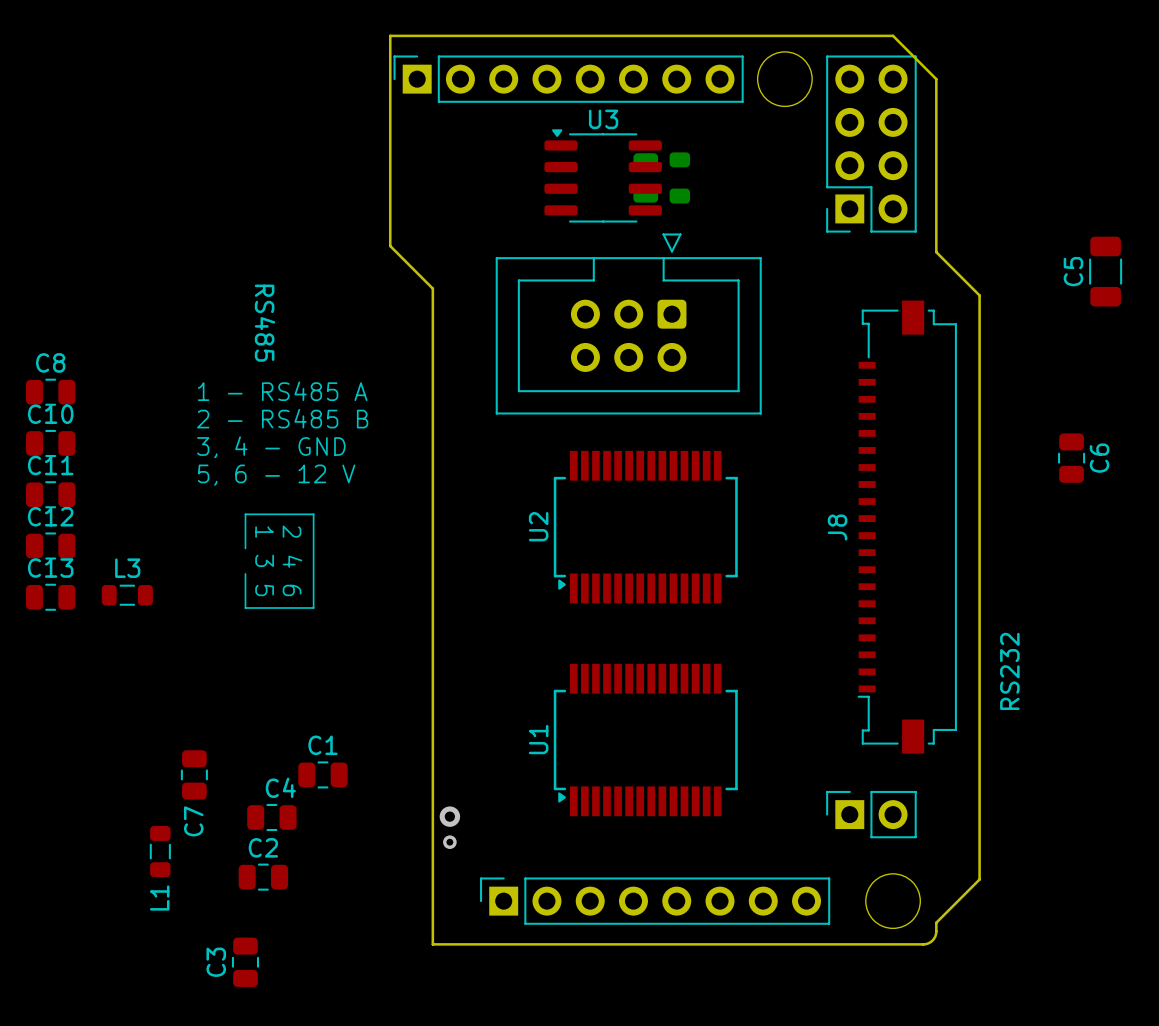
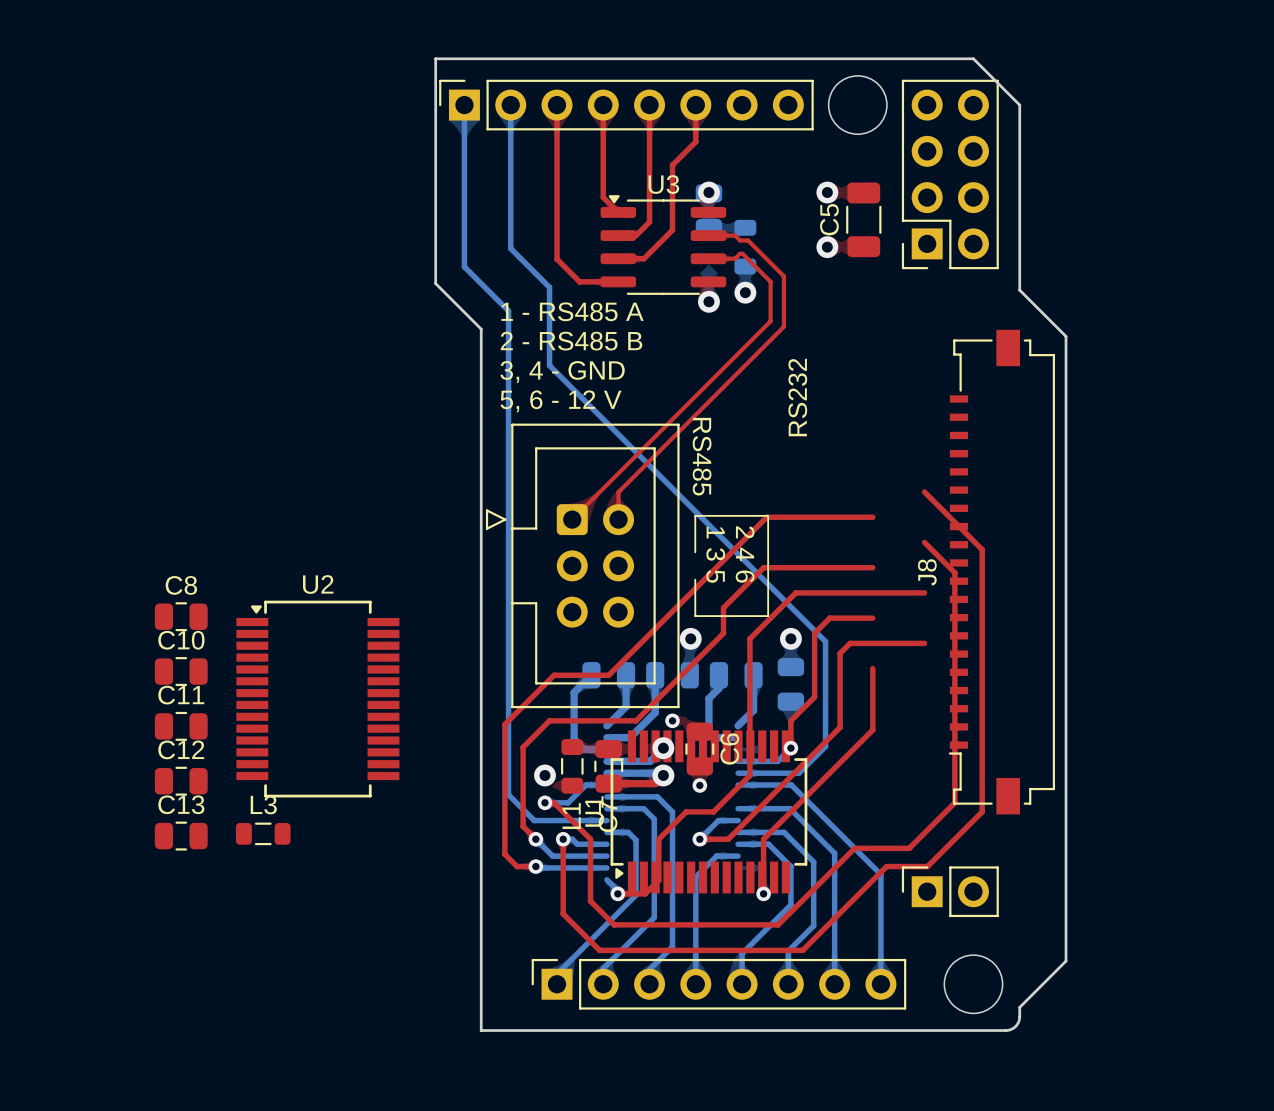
bottom track: none -> (464, 105) (464, 266) (508, 310) (508, 794) (534, 820) (606, 820)
bottom track: none -> (510, 105) (510, 248) (549, 287) (549, 365) (825, 641) (825, 746) (798, 773) (738, 773)
top track: none -> (557, 105) (557, 259) (579, 281) (618, 281)
top track: none -> (603, 105) (603, 197) (618, 212)
top track: none -> (649, 105) (649, 222) (636, 235) (618, 235)
top track: none -> (695, 105) (695, 141) (672, 165) (672, 230) (643, 258) (618, 258)
via: none -> (708, 192)
via: none -> (827, 192)
U3 position: (603, 175) -> (663, 245)
part position: (679, 177) -> (745, 247)
top track: none -> (708, 235) (735, 235) (740, 240) (748, 240) (783, 276) (783, 326) (618, 492) (618, 519)
via: none -> (827, 247)
top track: none -> (708, 258) (735, 258) (742, 253) (770, 281) (770, 321) (572, 519)
via: none -> (745, 292)
via: none -> (708, 301)
C5 position: (1105, 271) -> (863, 219)
text position: RS485 (265, 323) -> RS485 (702, 456)
part rotation: 0° (628, 323) -> 90° counterclockwise (582, 565)
part position: (628, 323) -> (582, 565)
text: none -> RS232 (797, 397)
text position: 1 - RS485 A (282, 391) -> 1 - RS485 A (572, 311)
C8 position: (50, 392) -> (181, 616)
text position: 2 - RS485 B (282, 418) -> 2 - RS485 B (571, 341)
top track: none -> (924, 492) (982, 549) (982, 811) (927, 866) (886, 866) (802, 950) (599, 950) (563, 913) (563, 839)
C10 position: (50, 443) -> (181, 671)
text position: 3, 4 - GND (271, 447) -> 3, 4 - GND (562, 372)
C6 position: (1071, 458) -> (699, 749)
top track: none -> (872, 517) (766, 517) (608, 675) (554, 675) (504, 724) (504, 854) (517, 866) (535, 866)
text position: 5, 6 - 12 V (276, 475) -> 5, 6 - 12 V (561, 401)
top track: none -> (924, 542) (954, 572) (954, 802) (909, 848) (854, 848) (778, 924) (614, 924) (590, 901) (590, 839) (554, 802) (544, 802)
C11 position: (50, 494) -> (181, 726)
top track: none -> (872, 567) (763, 567) (723, 607) (723, 633) (636, 720) (549, 720) (523, 747) (523, 826) (535, 839)
U2 rotation: 0° (645, 527) -> 90° clockwise (317, 699)
U2 position: (645, 527) -> (317, 699)
J8 position: (907, 527) -> (1001, 572)
top track: none -> (924, 592) (795, 592) (749, 638) (749, 775) (713, 811) (686, 811) (658, 839) (658, 880) (645, 893) (617, 893)
C12 position: (50, 546) -> (181, 781)
line: (245, 548) (245, 514) (313, 514) (313, 607) (245, 607) (245, 573) -> (695, 552) (695, 515) (768, 515) (768, 616) (695, 616) (695, 579)
top track: none -> (872, 618) (829, 618) (814, 633) (814, 697) (790, 720) (790, 748)
text position: 2 4 6 (292, 560) -> 2 4 6 (745, 554)
text position: 1 3 5 (264, 561) -> 1 3 5 (715, 554)
via: none -> (690, 638)
via: none -> (790, 638)
top track: none -> (924, 643) (850, 643) (840, 653) (840, 727) (728, 839) (699, 839)
L3 position: (127, 595) -> (263, 833)
C13 position: (50, 597) -> (181, 836)
top track: none -> (872, 668) (872, 730) (763, 839) (763, 893)
bottom track: none -> (591, 675) (574, 692) (574, 739) (584, 749) (606, 749)
bottom track: none -> (626, 675) (626, 706) (606, 725)
bottom track: none -> (655, 675) (655, 712) (630, 737) (606, 737)
bottom track: none -> (718, 675) (718, 688) (708, 698) (708, 731) (715, 737) (738, 737)
part: none -> (736, 675)
bottom track: none -> (753, 675) (753, 710) (738, 725)
part: none -> (790, 684)
via: none -> (672, 720)
text: RS232 (1009, 671) -> none
bottom track: none -> (663, 748) (650, 761) (606, 761)
via: none -> (663, 748)
bottom track: none -> (790, 748) (777, 761) (738, 761)
via: none -> (790, 748)
bottom track: none -> (606, 773) (661, 773) (663, 775)
via: none -> (544, 775)
top track: none -> (663, 775) (655, 783) (608, 783)
via: none -> (663, 775)
bottom track: none -> (606, 785) (585, 785) (568, 802) (544, 802)
bottom track: none -> (738, 785) (791, 785) (880, 874) (880, 984)
via: none -> (699, 785)
bottom track: none -> (606, 796) (657, 796) (672, 811) (672, 946) (649, 969) (649, 984)
via: none -> (544, 802)
bottom track: none -> (606, 808) (643, 808) (654, 819) (654, 917) (603, 968) (603, 984)
bottom track: none -> (738, 808) (790, 808) (834, 853) (834, 984)
bottom track: none -> (738, 820) (718, 820) (699, 839)
bottom track: none -> (606, 832) (628, 832) (636, 840) (636, 895) (557, 974) (557, 984)
bottom track: none -> (738, 832) (784, 832) (813, 862) (813, 925) (788, 951) (788, 984)
bottom track: none -> (535, 839) (552, 856) (606, 856)
via: none -> (535, 839)
bottom track: none -> (563, 839) (572, 839) (577, 844) (606, 844)
via: none -> (563, 839)
via: none -> (699, 839)
bottom track: none -> (738, 844) (768, 844) (790, 866) (790, 904) (742, 953) (742, 984)
C7 position: (194, 774) -> (608, 766)
C1 side: top (322, 774) -> bottom (608, 675)
bottom track: none -> (738, 856) (716, 856) (695, 876) (695, 984)
bottom track: none -> (535, 866) (606, 867)
via: none -> (535, 866)
bottom track: none -> (606, 879) (617, 890) (617, 893)
via: (449, 816) -> none
via: none -> (617, 893)
via: none -> (763, 893)
C4 side: top (271, 817) -> bottom (672, 675)
via: (449, 842) -> none
L1 position: (160, 851) -> (572, 766)
C2: (263, 877) -> none
C3: (245, 962) -> none

